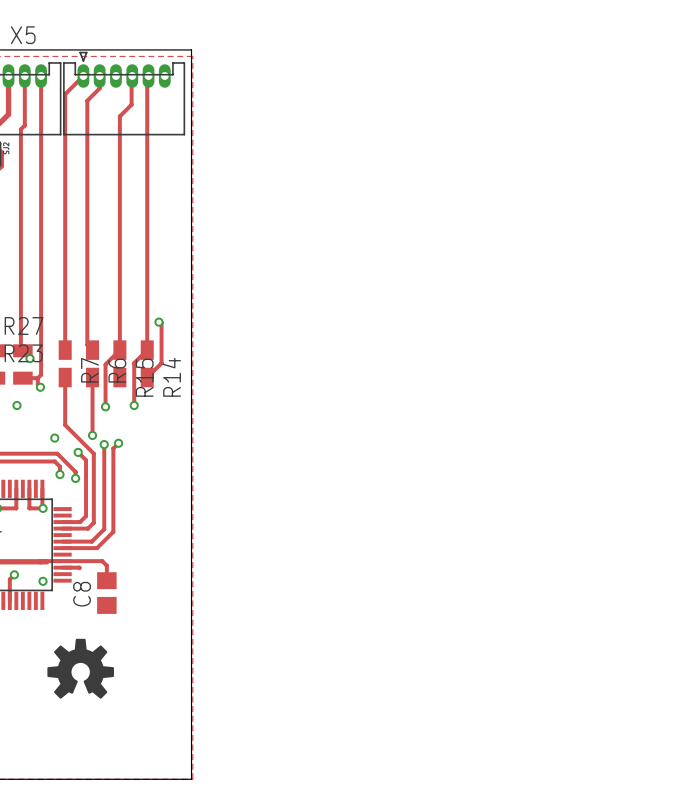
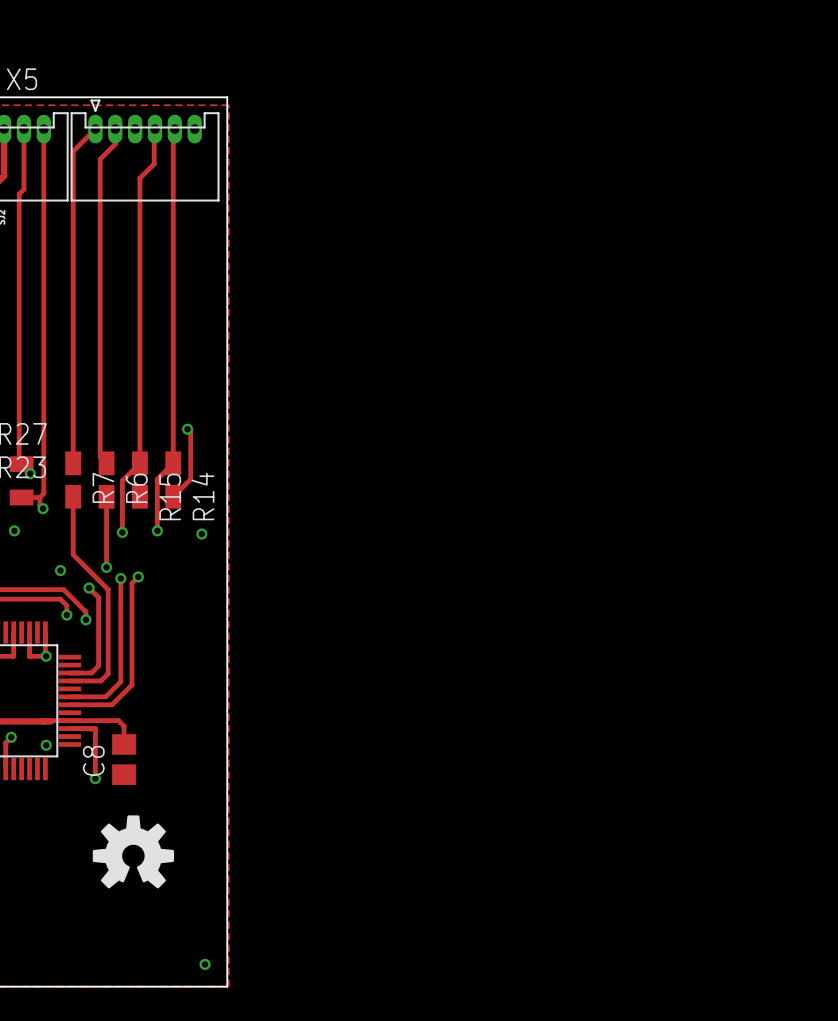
via: none -> (201, 534)
track: none -> (90, 728) (95, 728) (95, 778)
via: none -> (95, 778)
drawing position: (80, 668) -> (133, 851)
via: none -> (205, 964)

